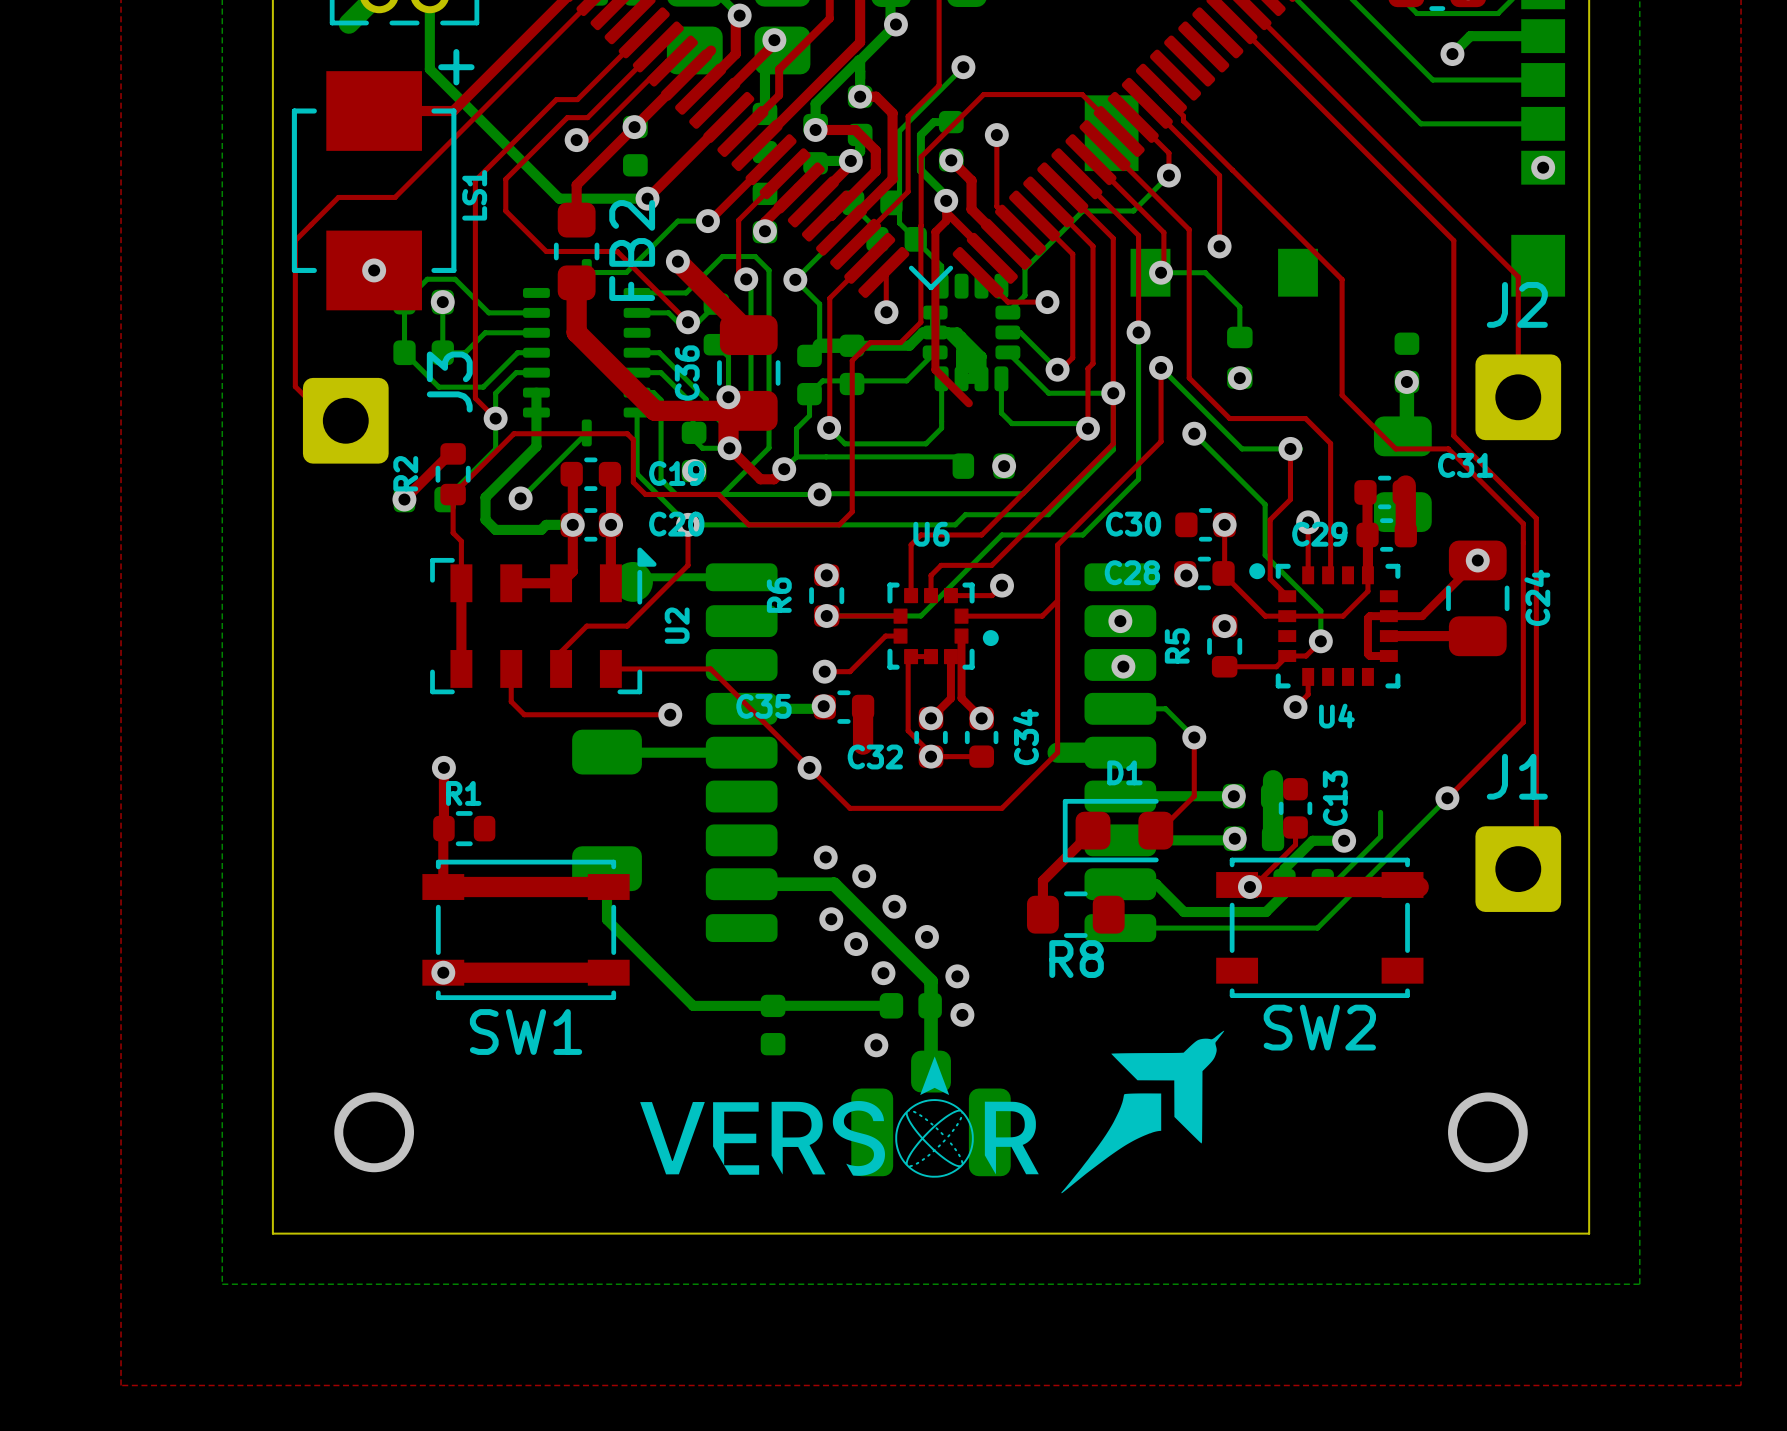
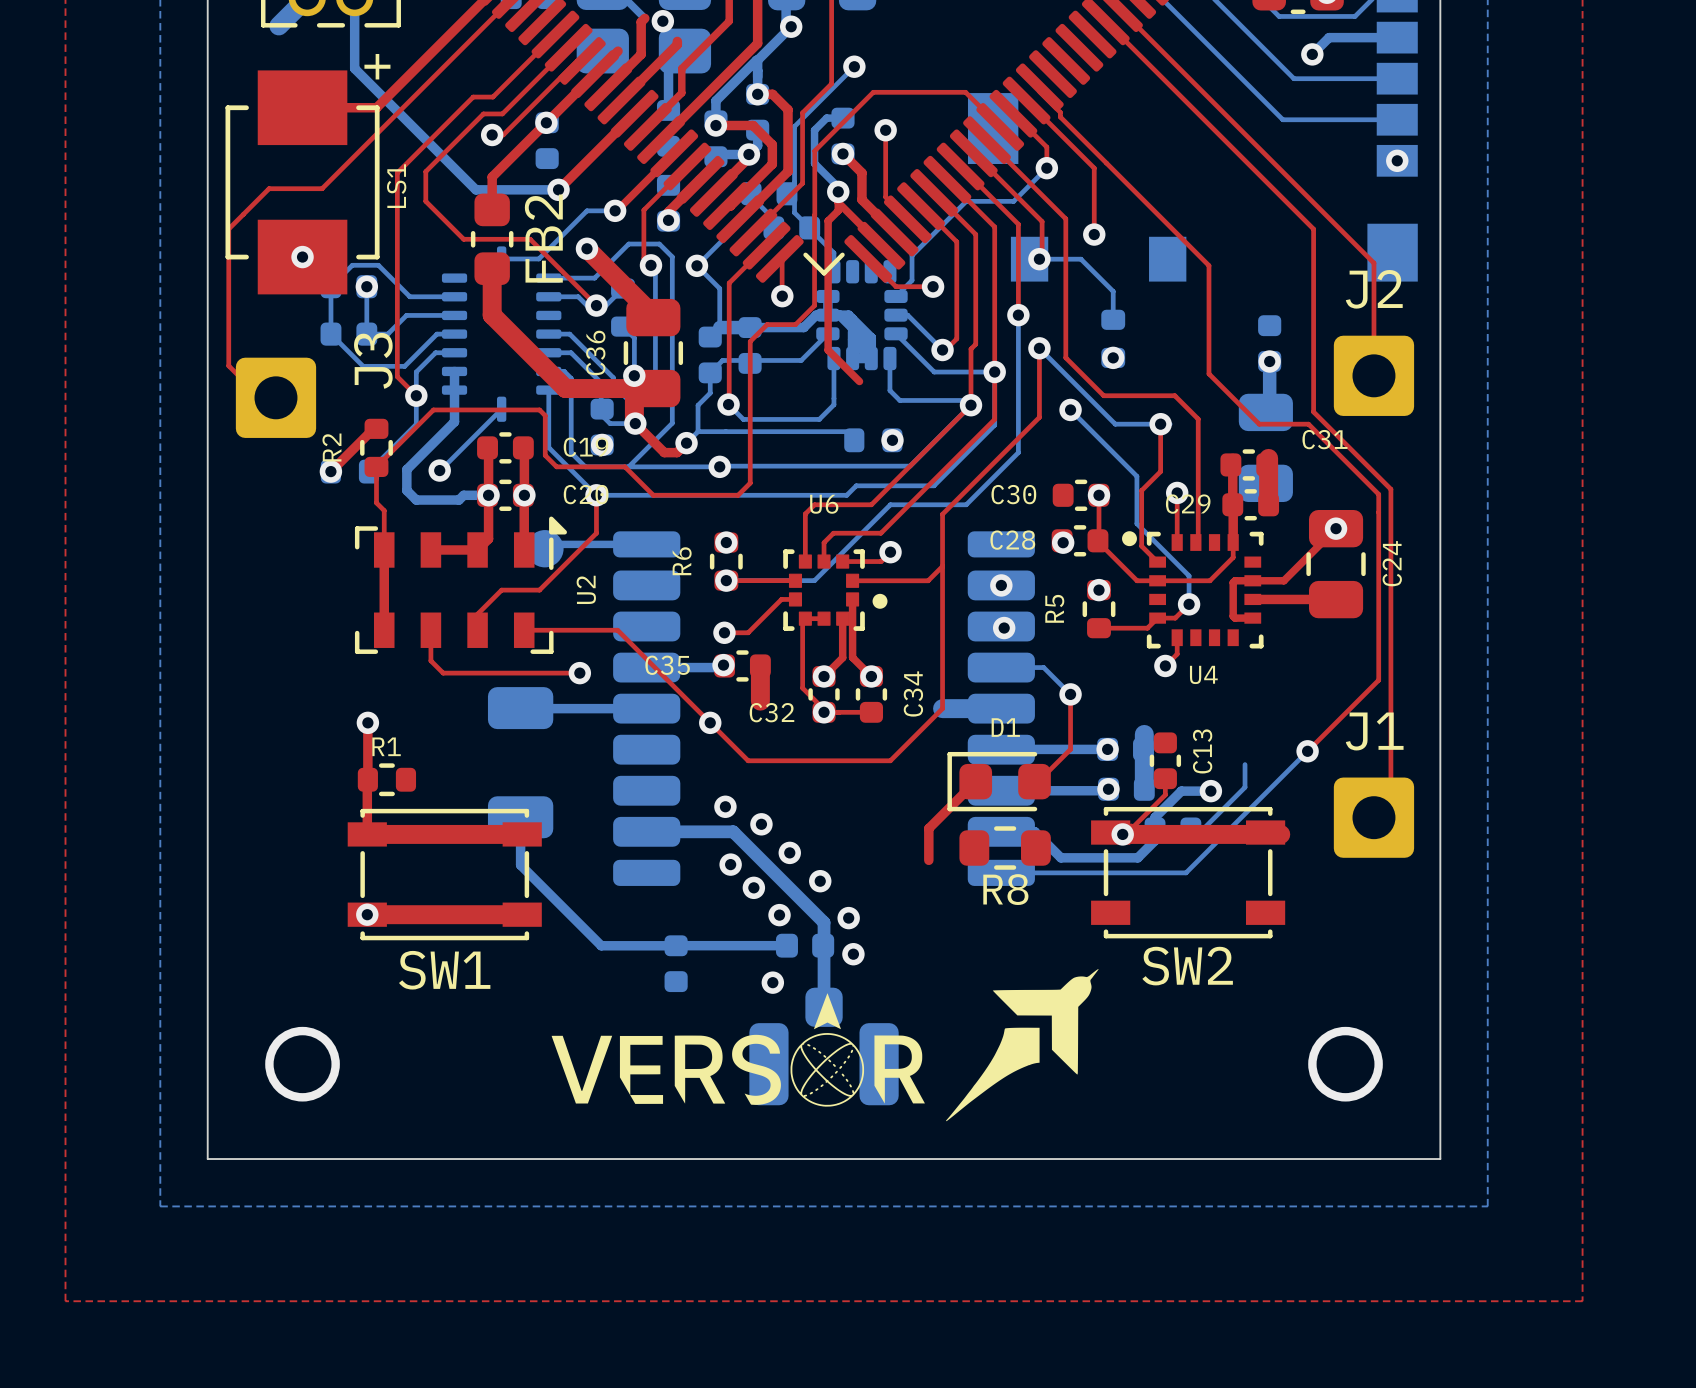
via: (739, 15) -> none
via: none -> (662, 21)
via: (774, 40) -> none
R8 position: (1075, 914) -> (1005, 848)

